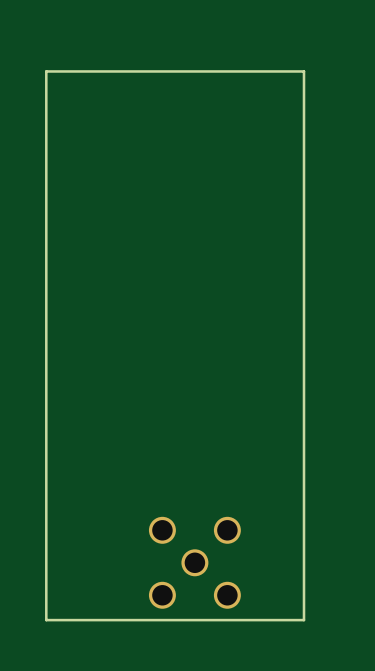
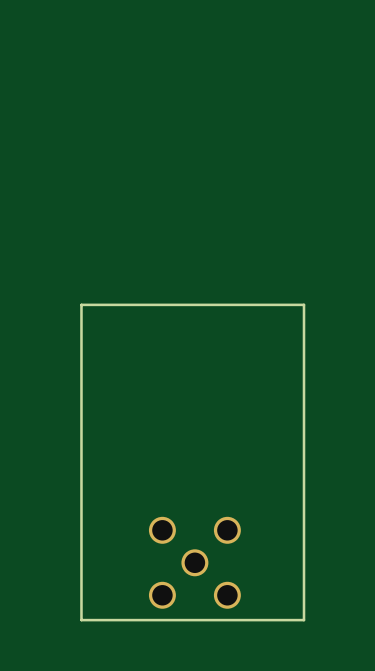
board edge: (304, 304) (304, 71) (46, 71) (46, 620) (81, 620) -> (304, 304) (81, 304) (81, 620)

